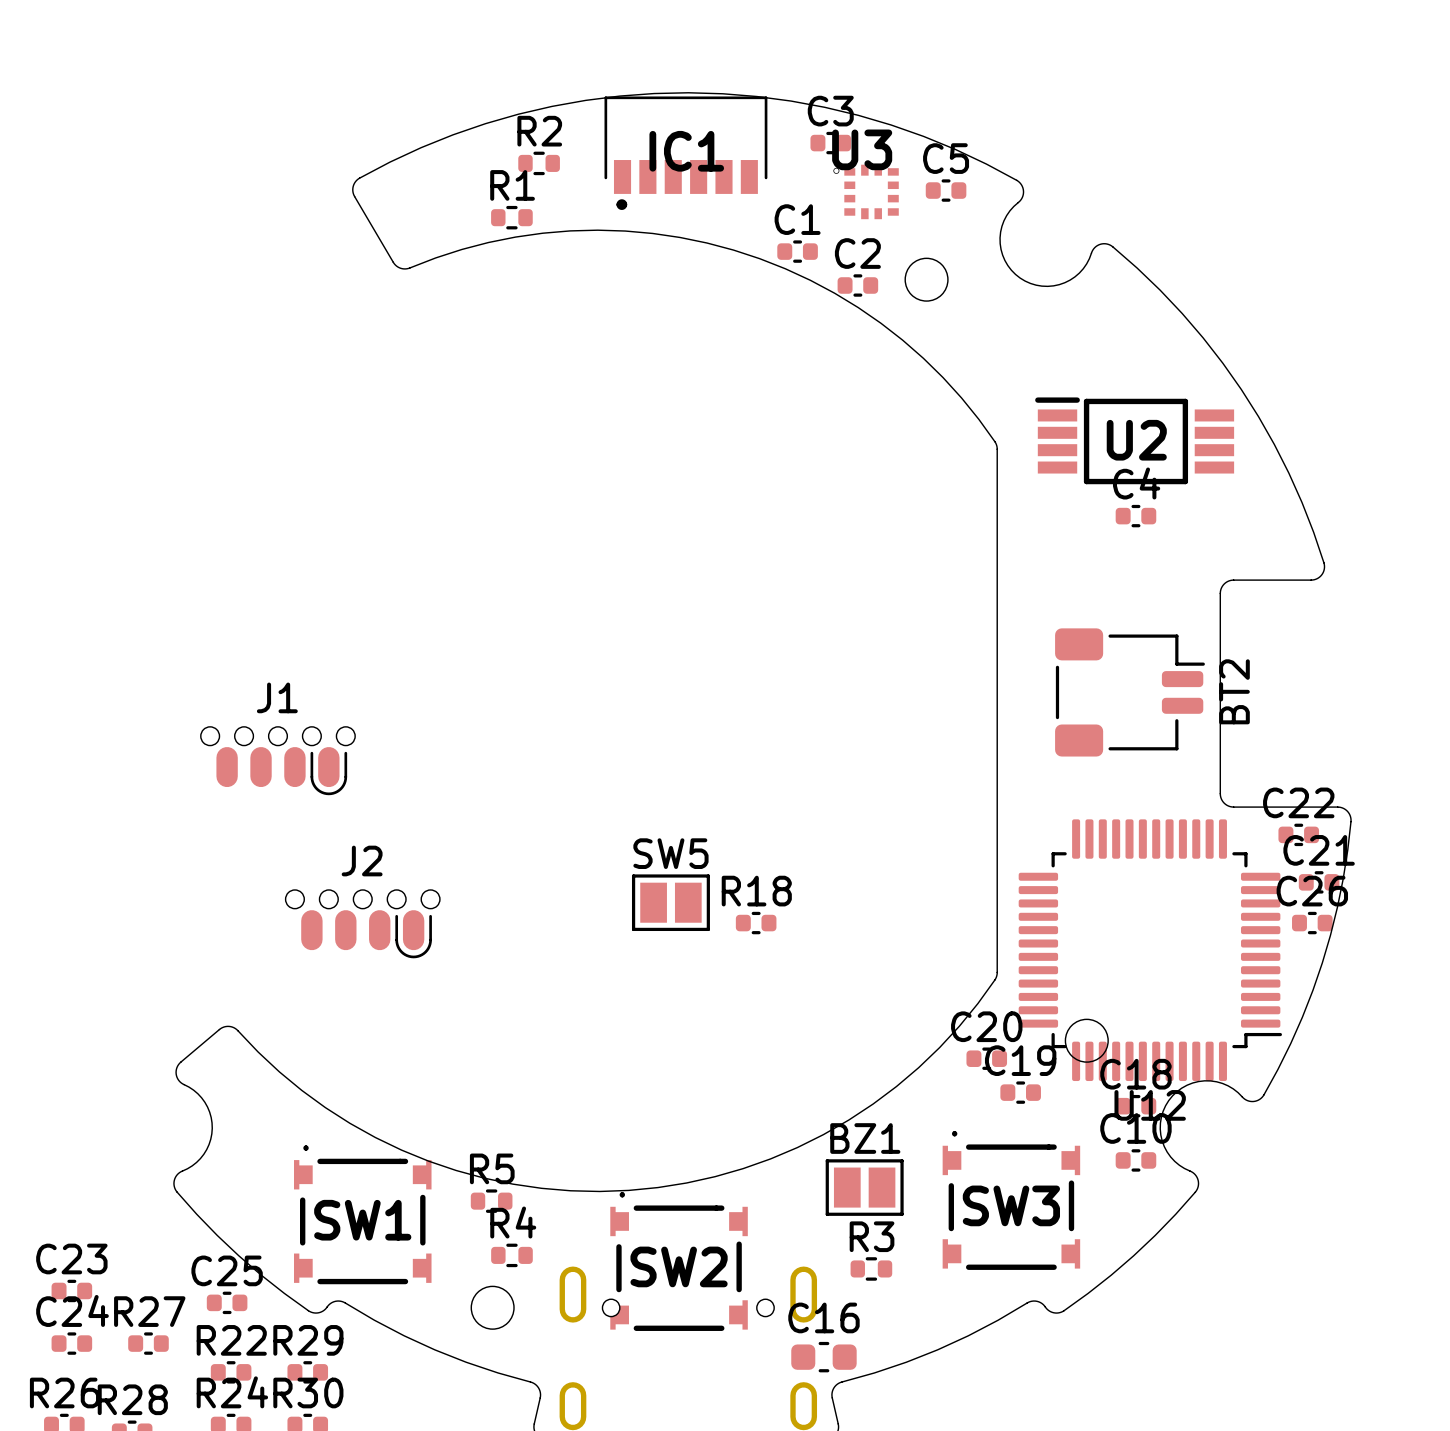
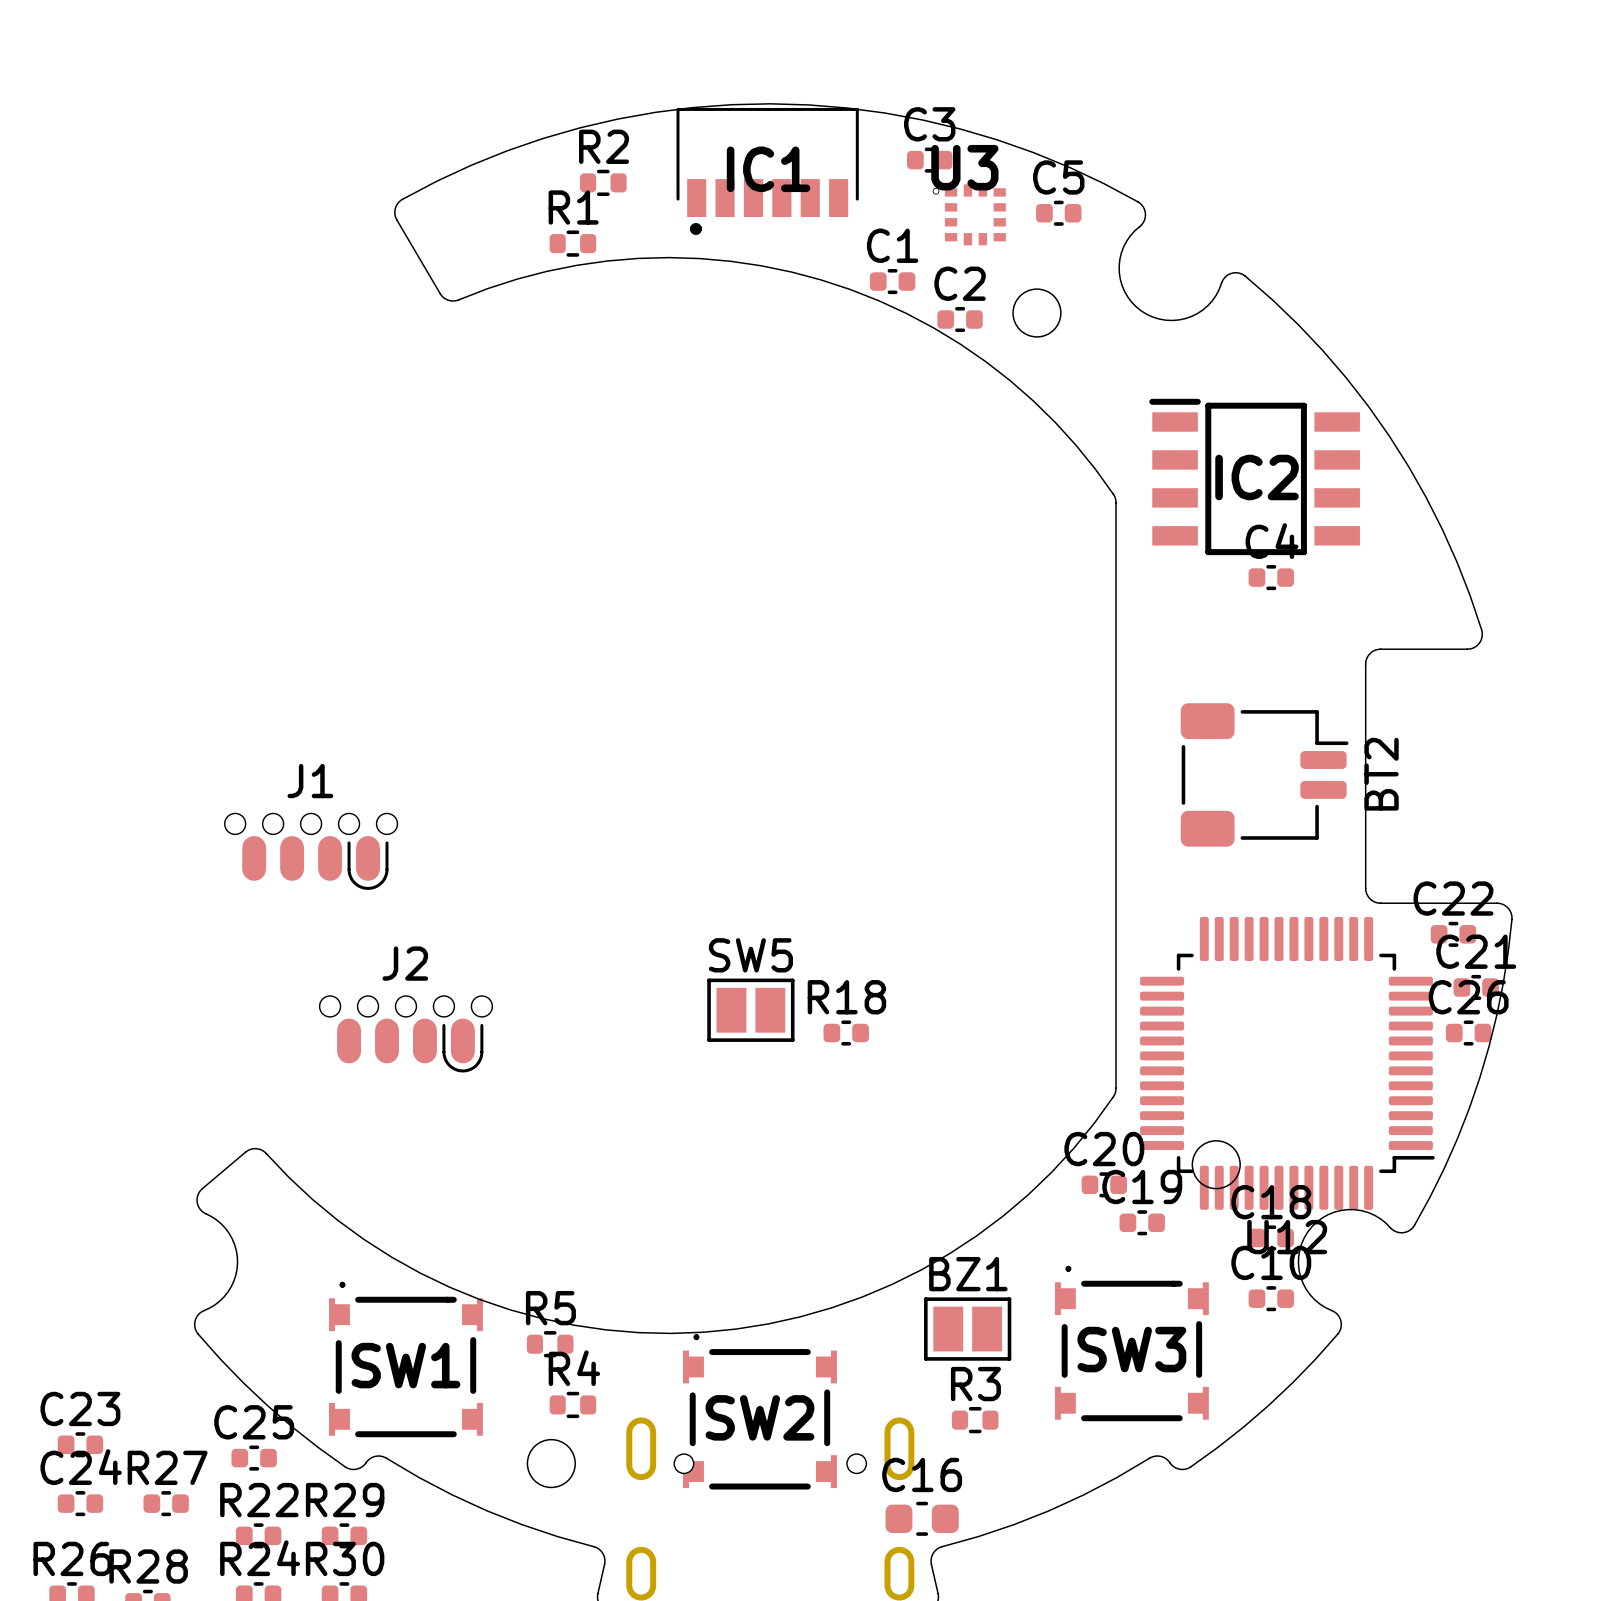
IC2: none -> (1254, 476)
U2: (1134, 440) -> none

